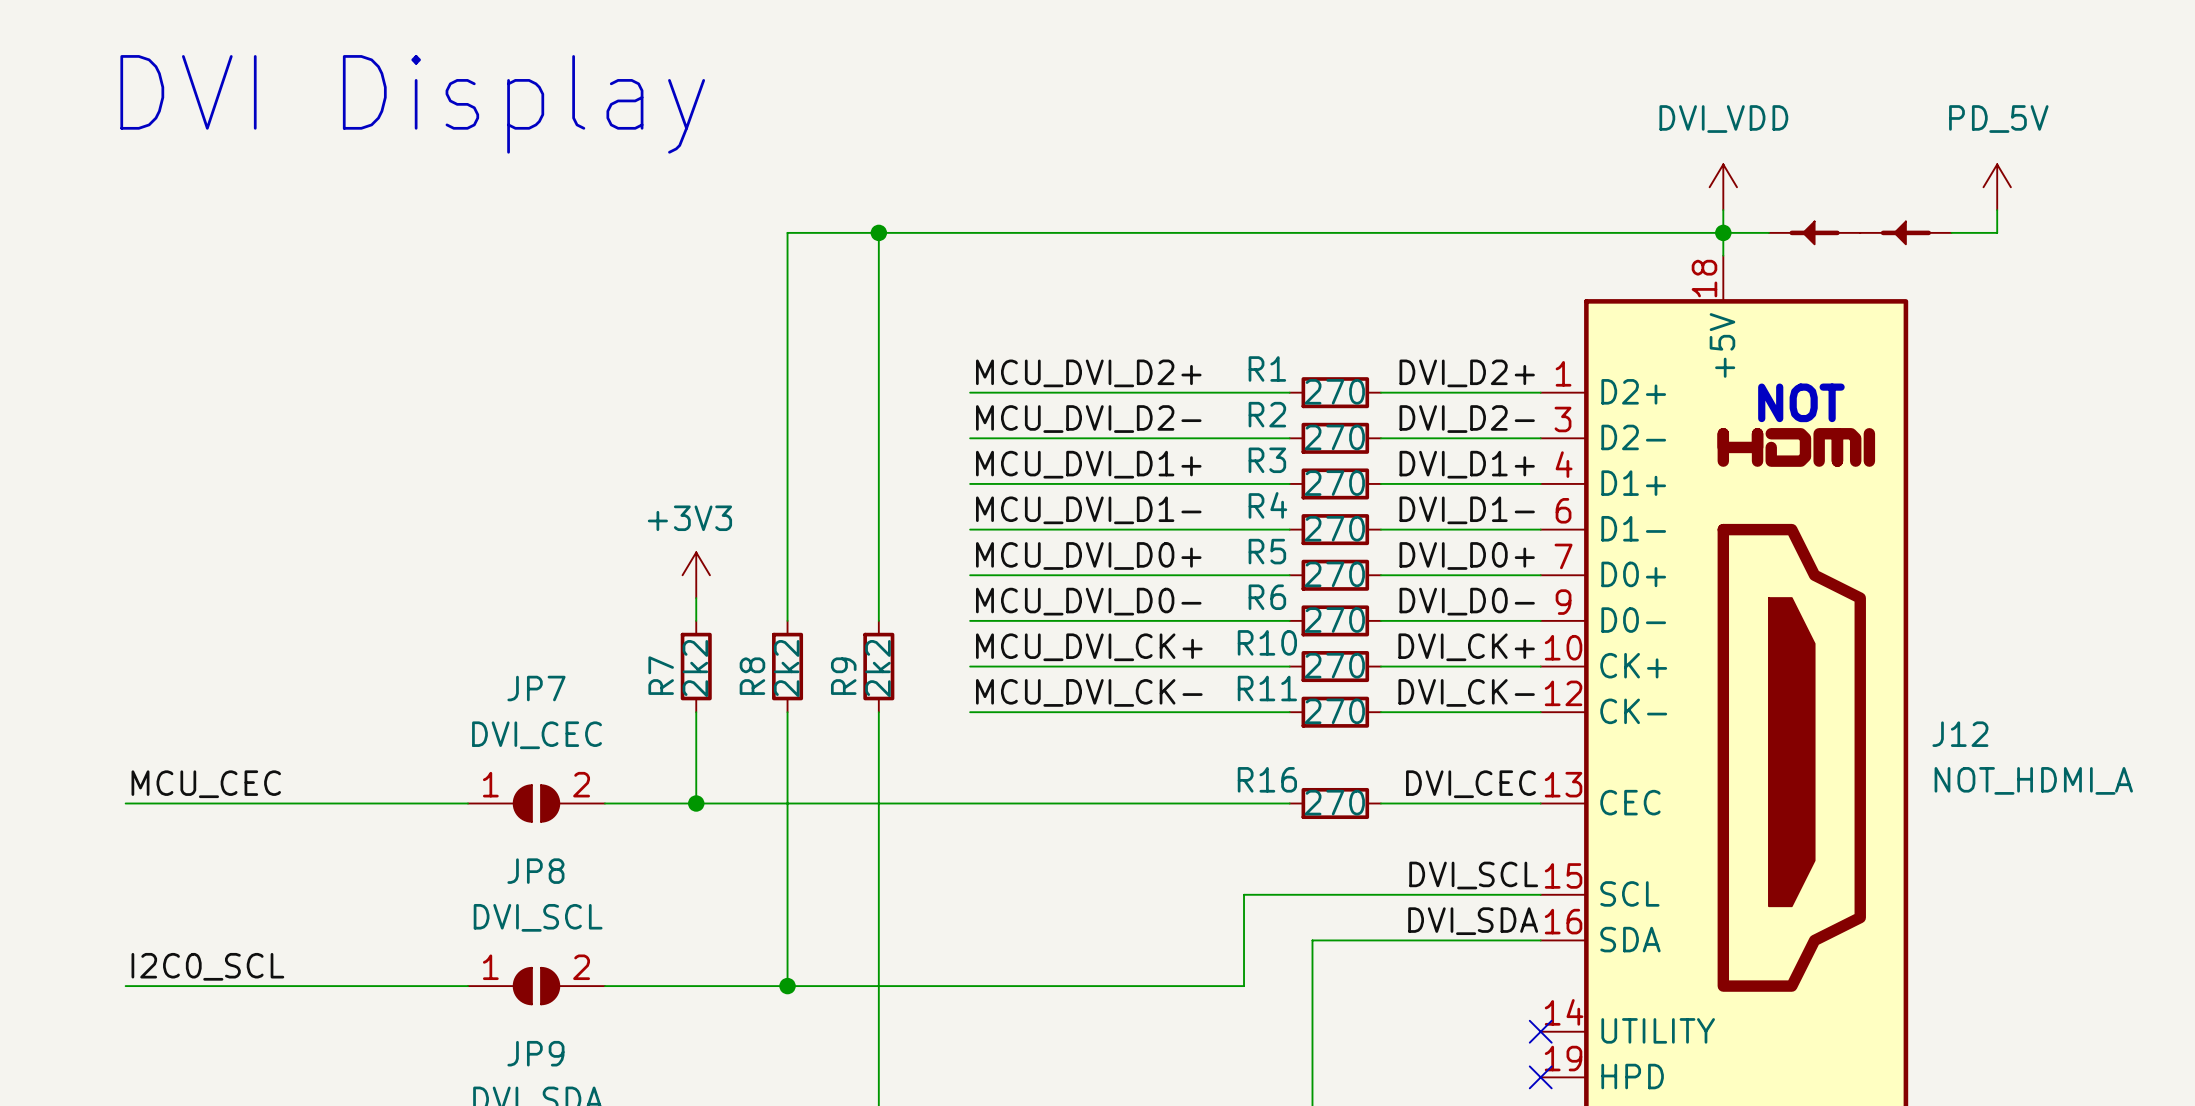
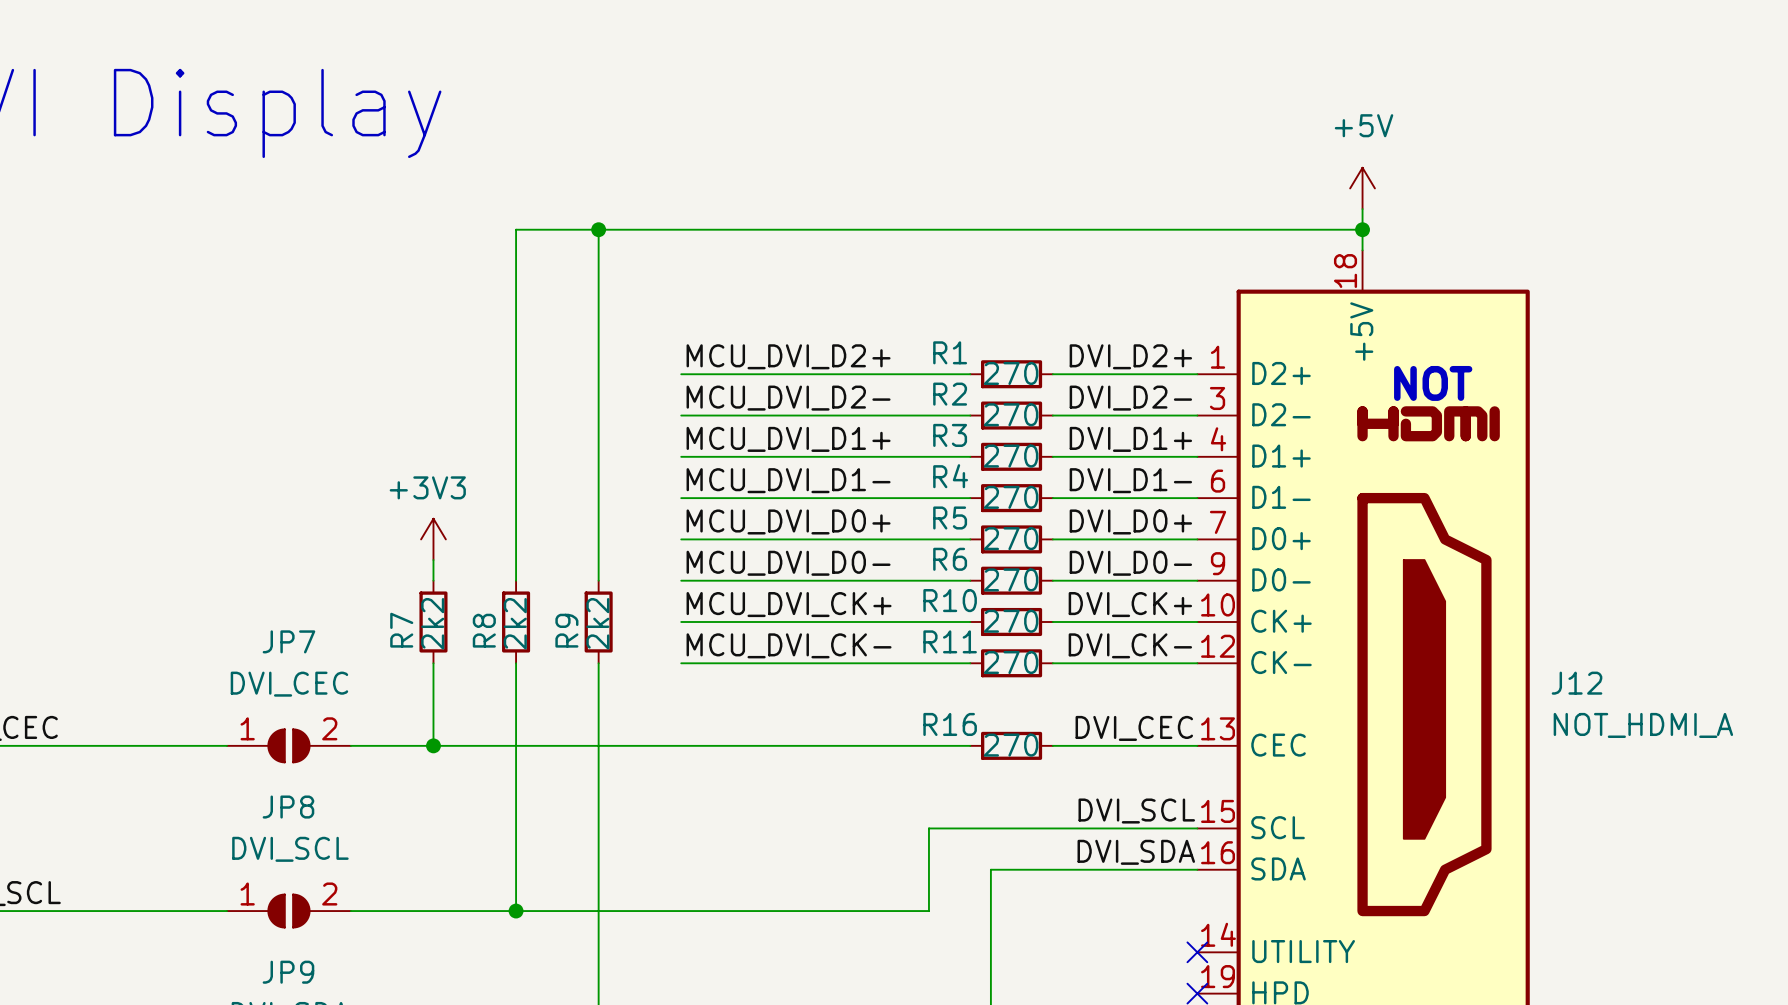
power symbol: DVI_VDD (1723, 187) -> +5V (1362, 188)
power symbol: PD_5V (1997, 187) -> none
wire: (1997, 210) (1997, 232) (1951, 232) -> none
wire: (1723, 232) (1768, 232) -> none
part: (1814, 232) -> none
part: (1905, 232) -> none

